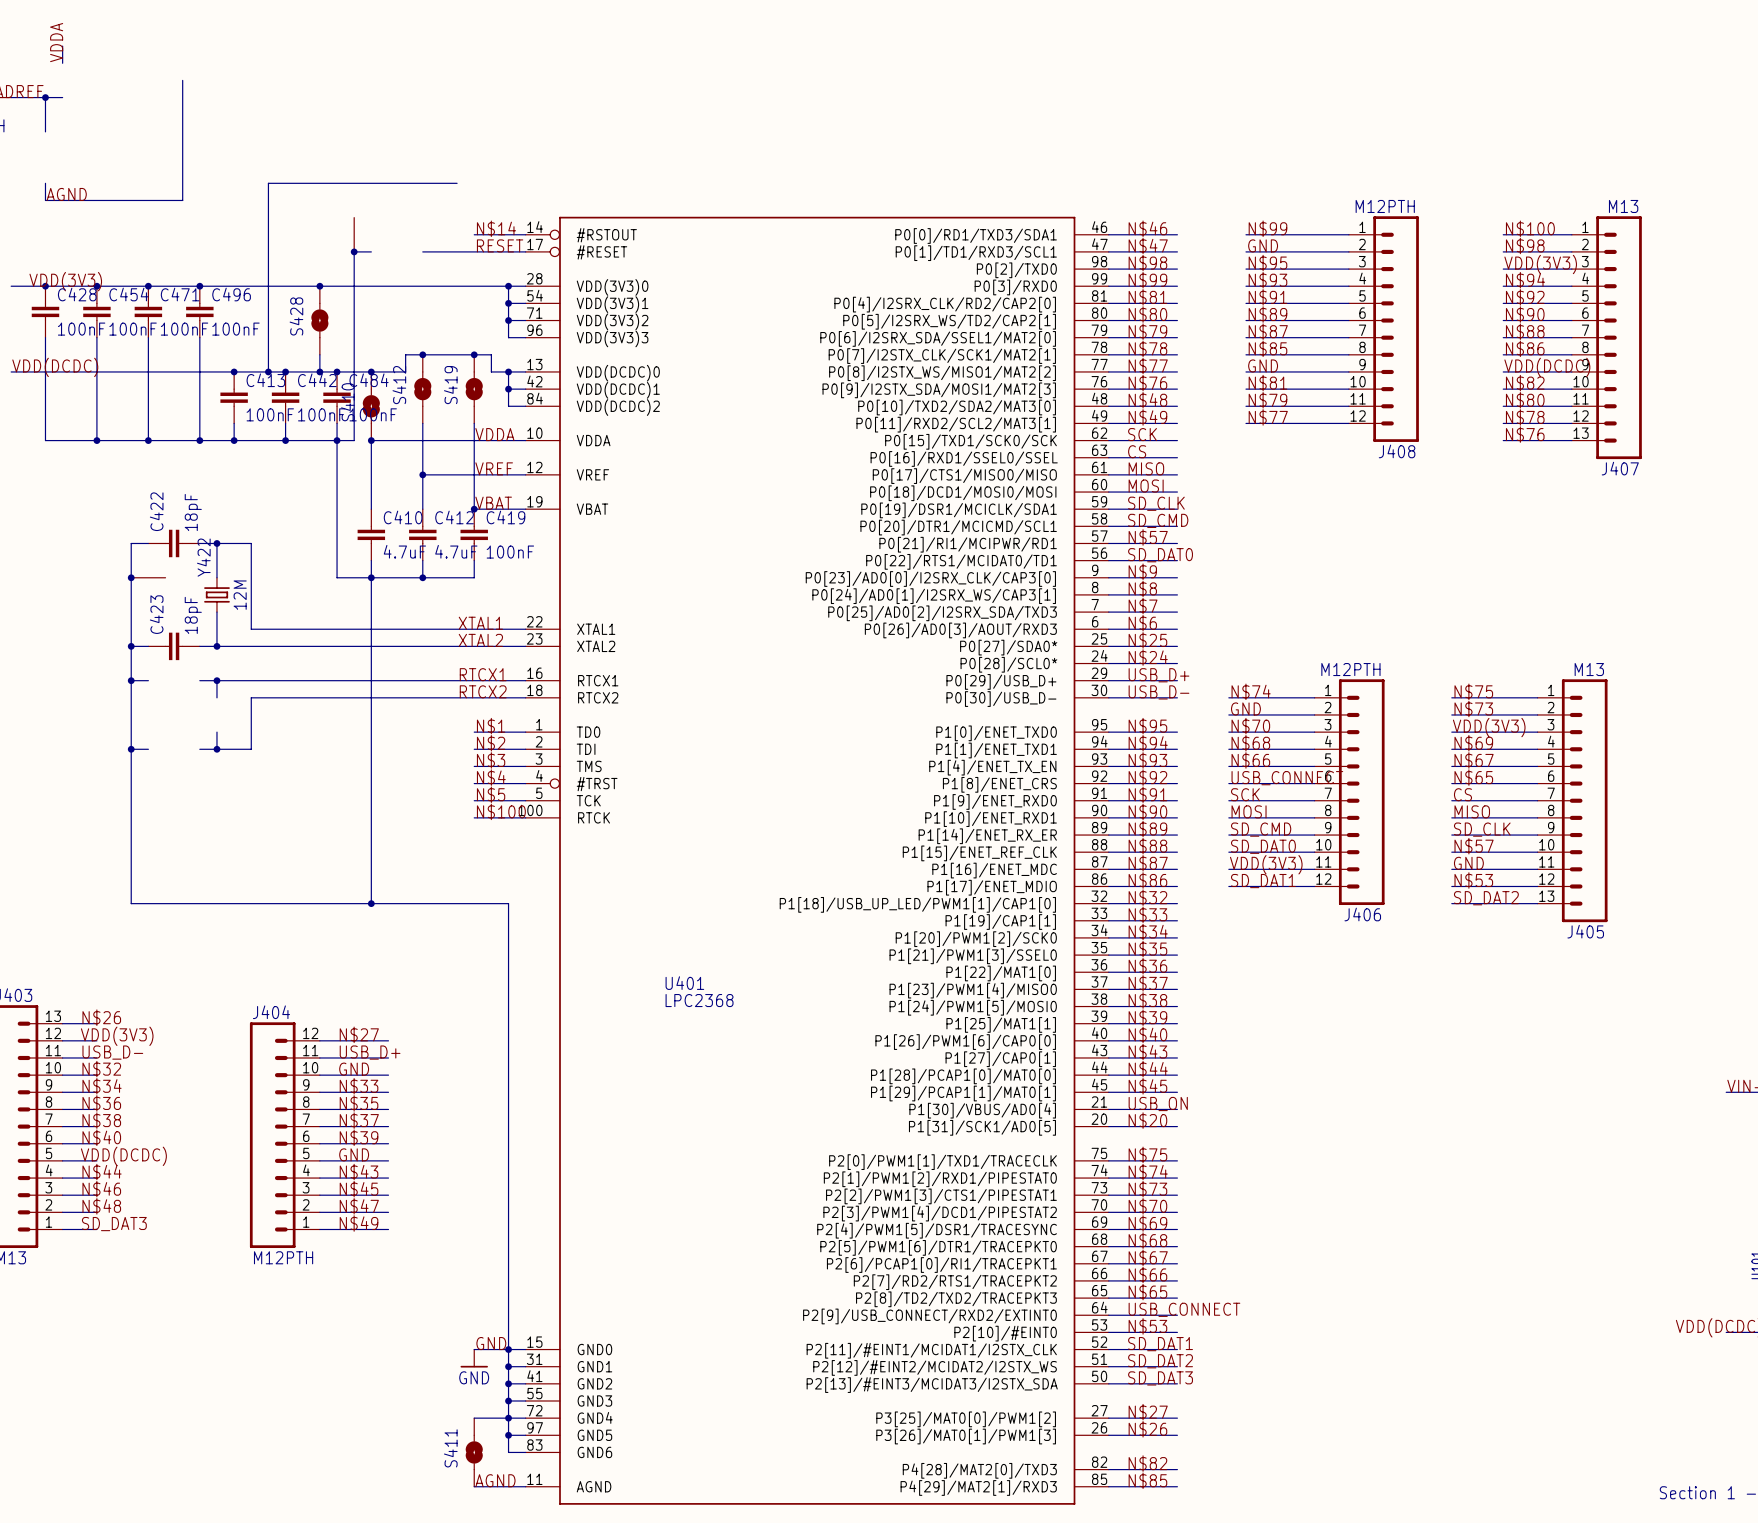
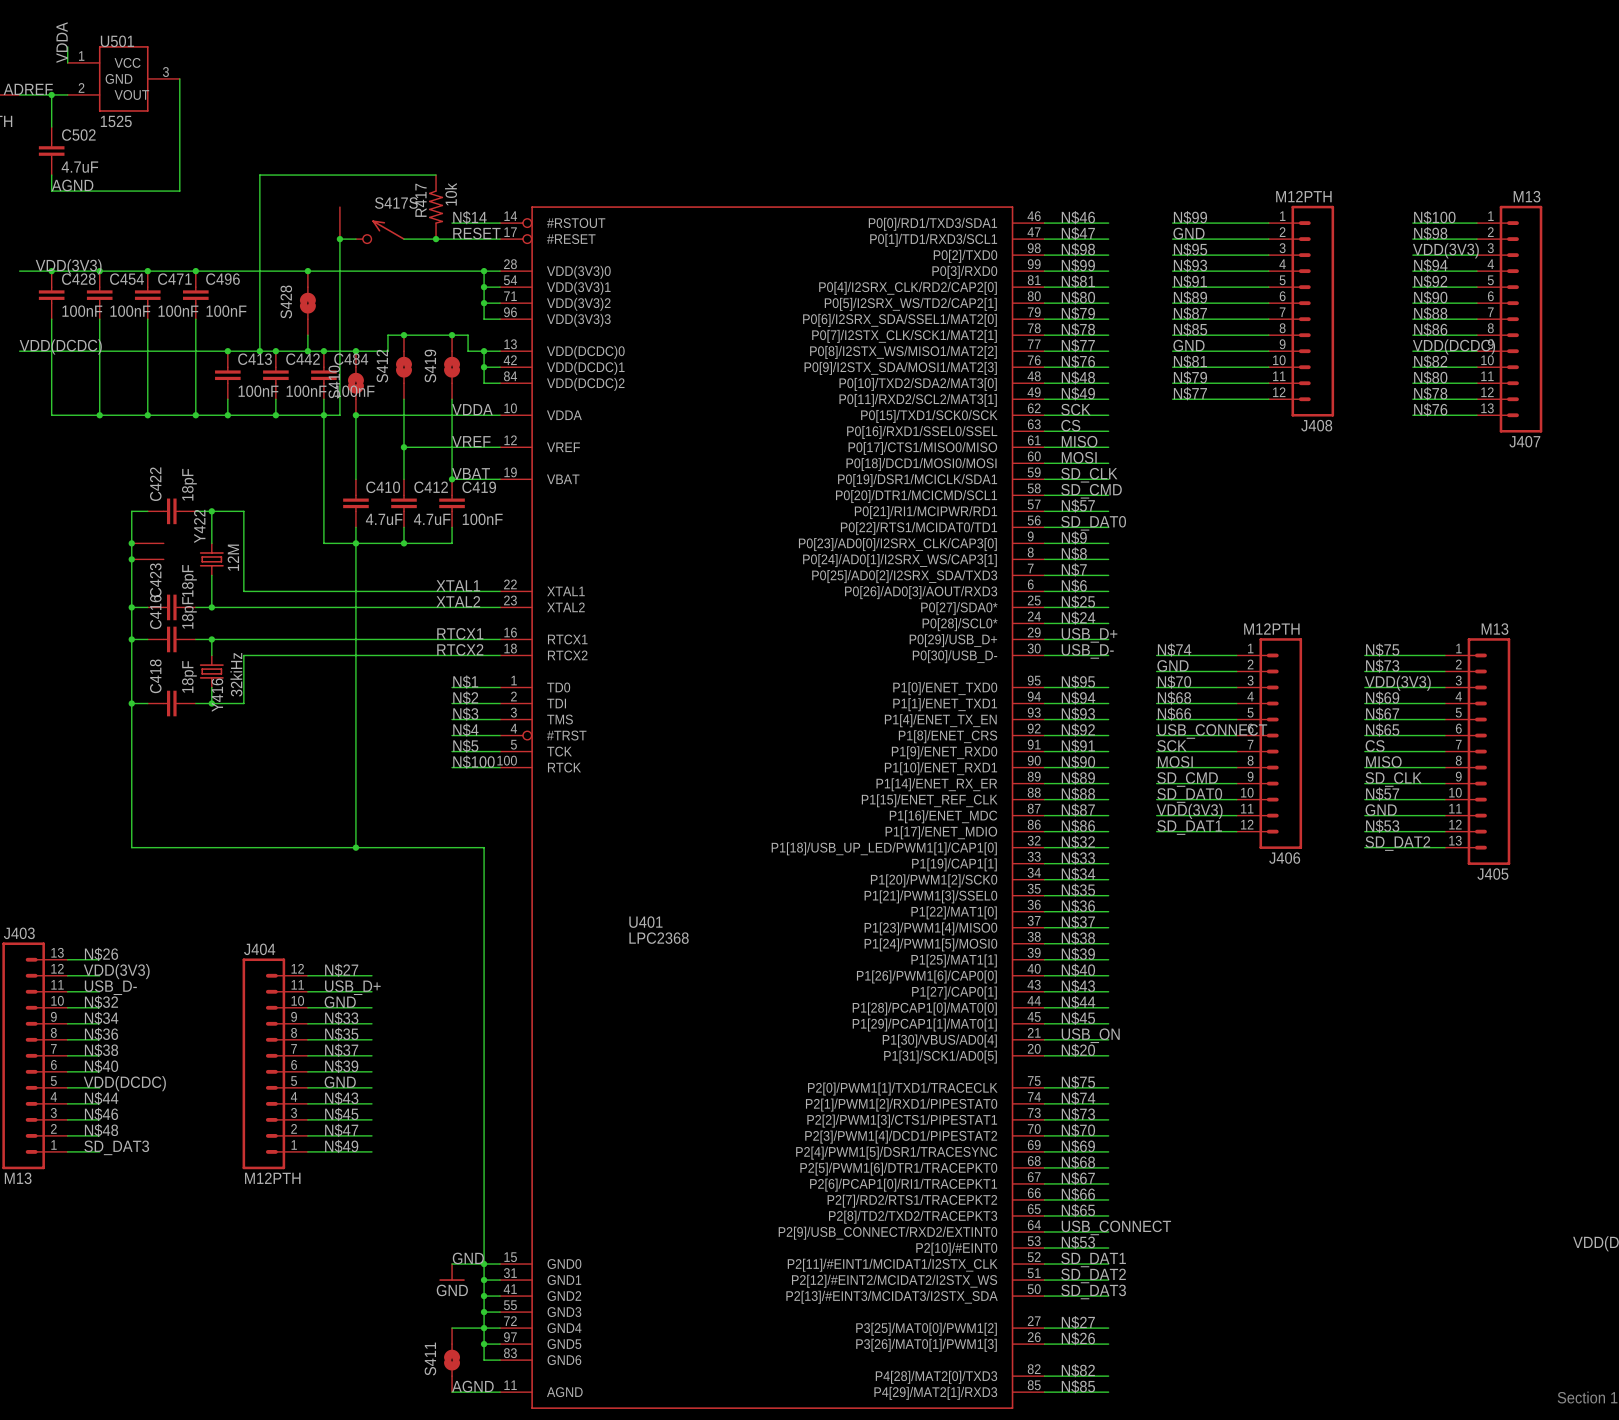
U501: none -> 1525 (123, 78)
C502: none -> 4.7uF (51, 151)
R417: none -> 10k (436, 207)
S417S: none -> (380, 231)
junction: none -> (436, 239)
junction: none -> (131, 559)
part: none -> (147, 559)
C416: none -> 18pF (171, 639)
Y416: none -> 32kiHz (211, 671)
C418: none -> 18pF (171, 703)

